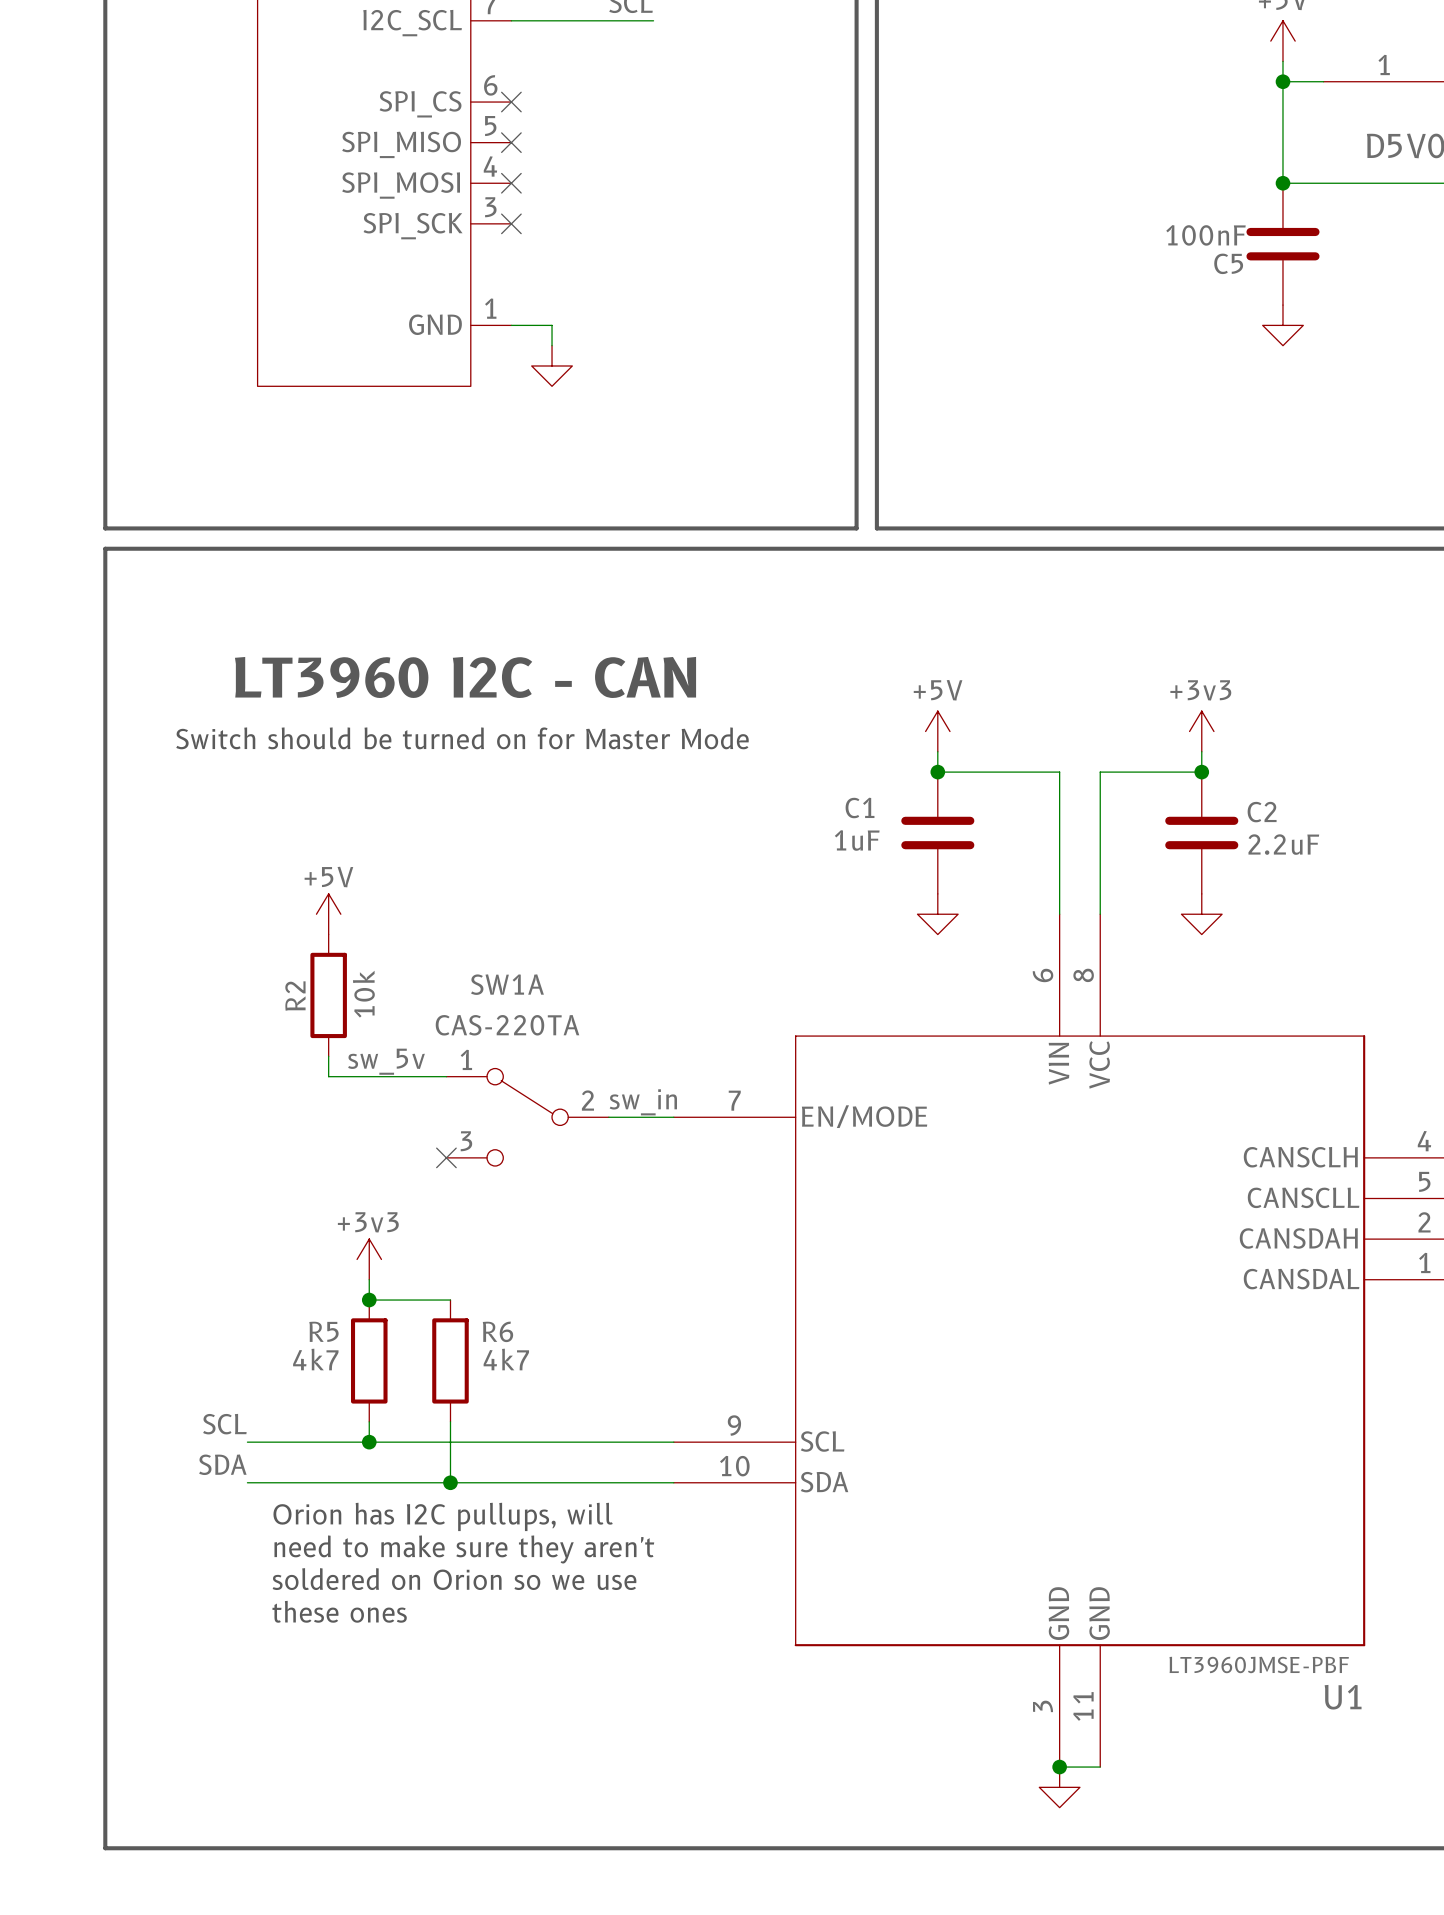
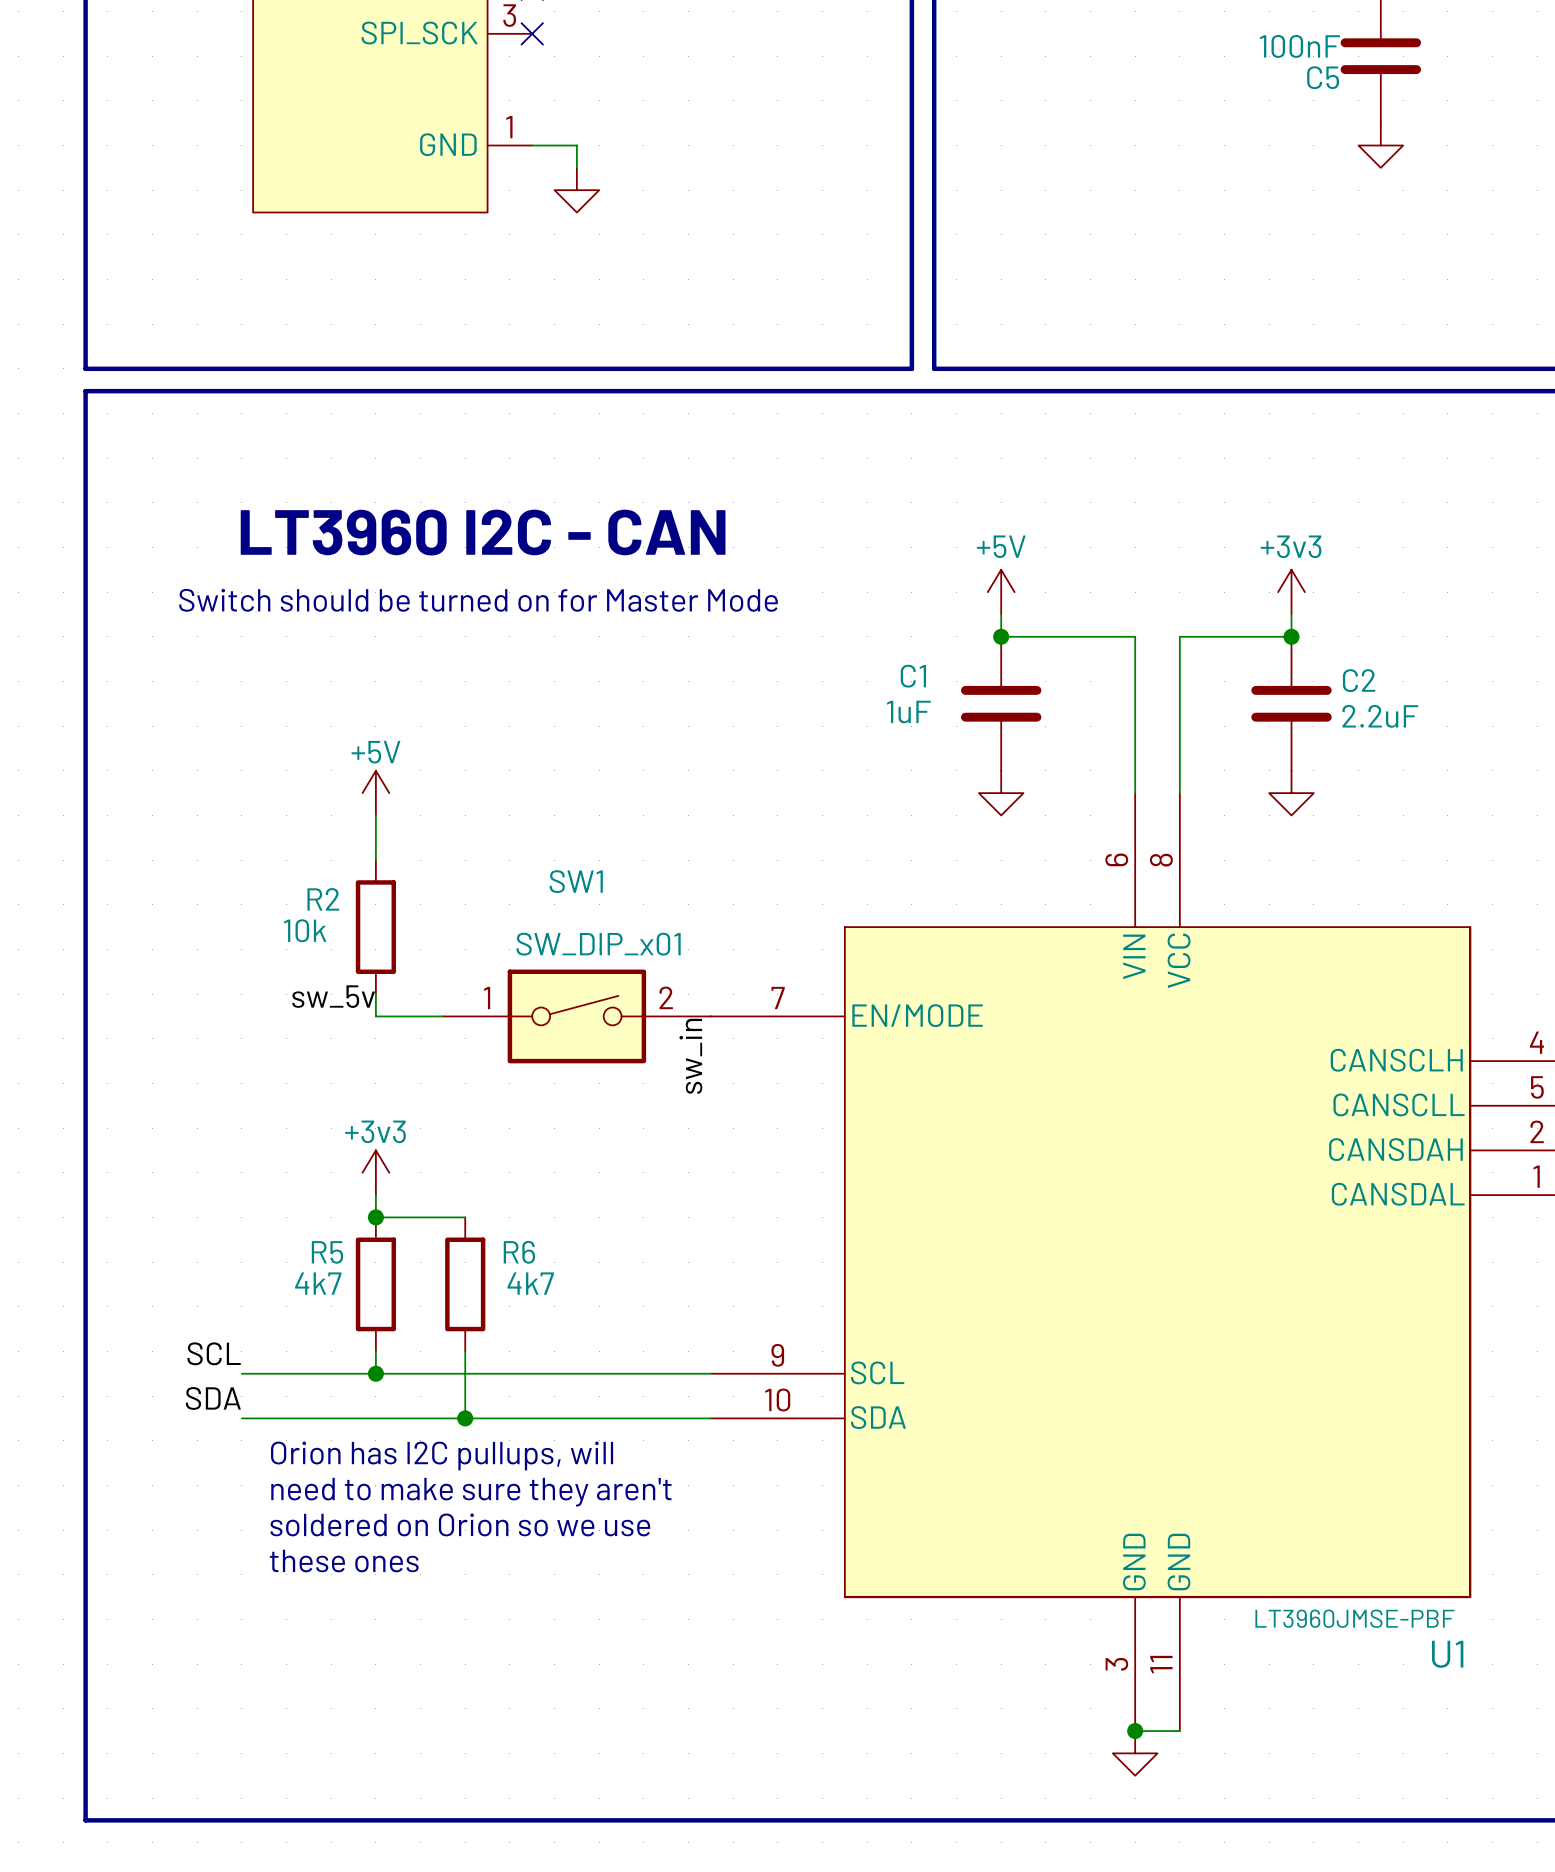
power symbol position: +5V (328, 914) -> +5V (375, 793)
wire: none -> (375, 815) (375, 860)
R2 value rotation: 0° (363, 994) -> 90° clockwise (305, 930)
R2 position: (328, 995) -> (375, 927)
R2 name rotation: 0° (295, 996) -> 90° clockwise (323, 899)
wire: (328, 1056) (328, 1076) (446, 1076) -> none
label position: sw_5v (386, 1061) -> sw_5v (333, 996)
wire: none -> (375, 994) (375, 1016) (442, 1016)
label rotation: 0° (643, 1102) -> 90° counterclockwise (690, 1056)
SW1A: CAS-220TA (527, 1117) -> none
SW1: none -> SW_DIP_x01 (576, 1016)
no-connect mark: (446, 1157) -> none

